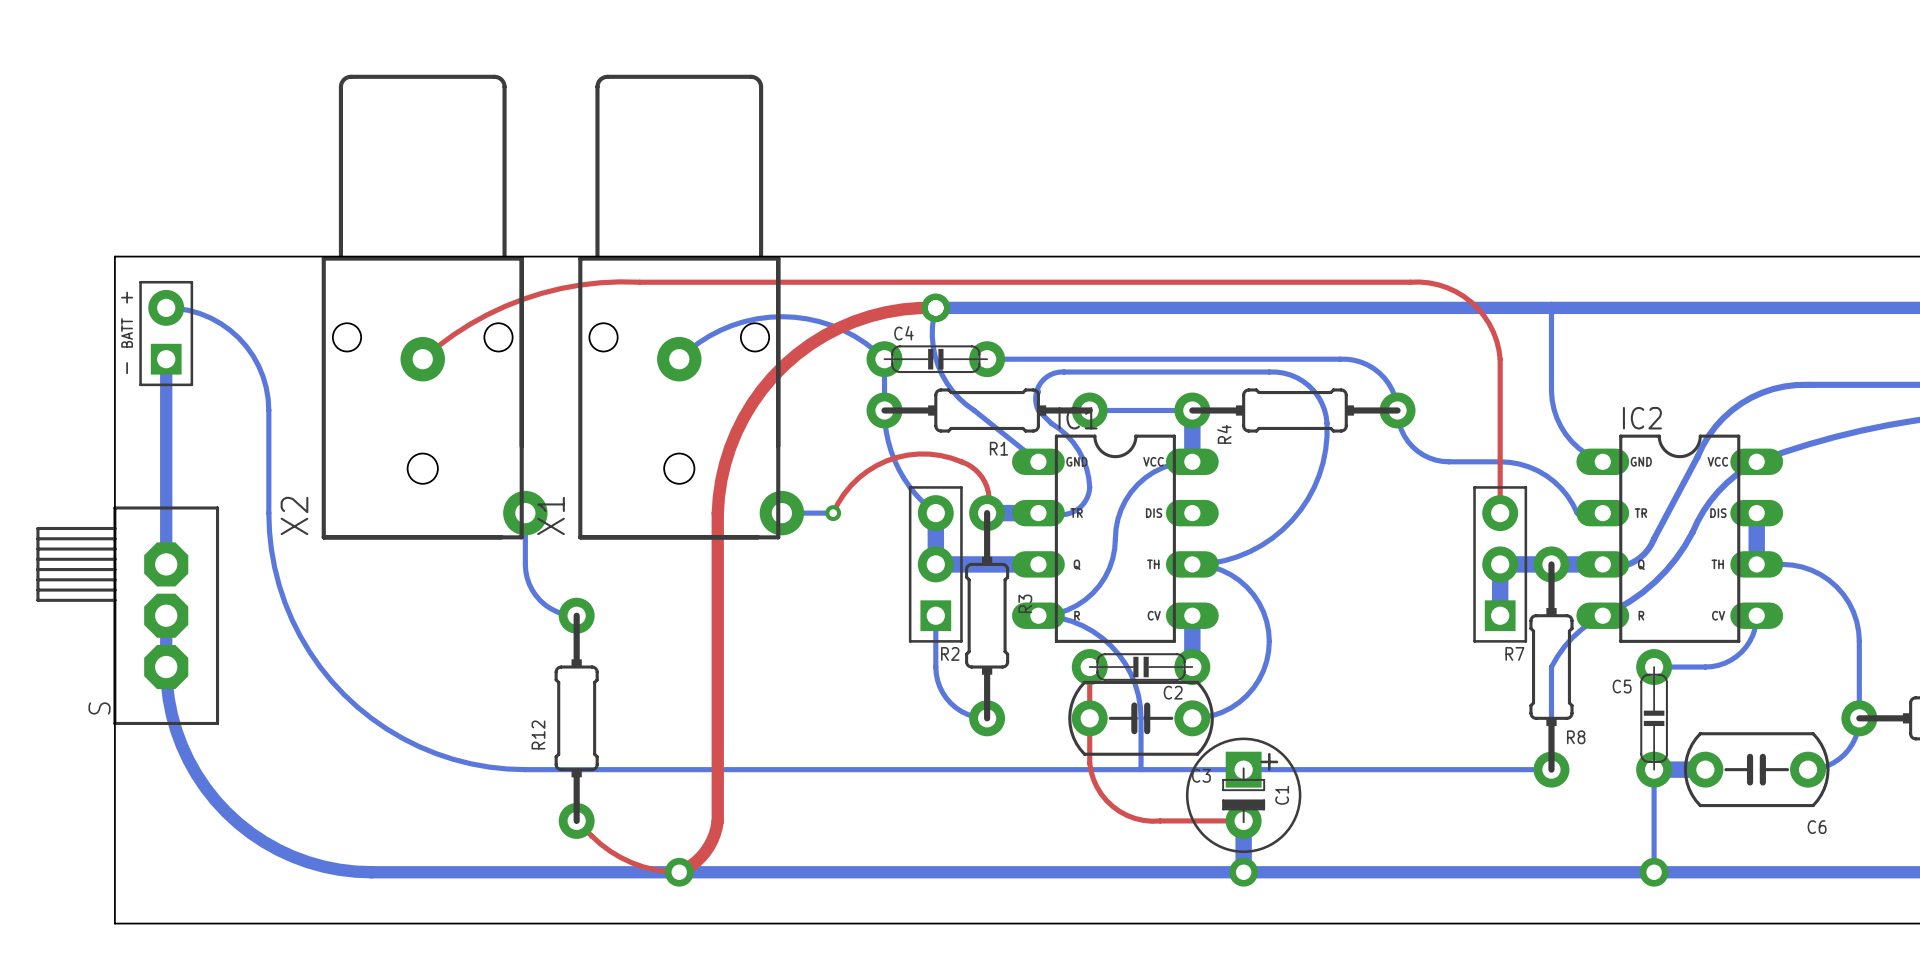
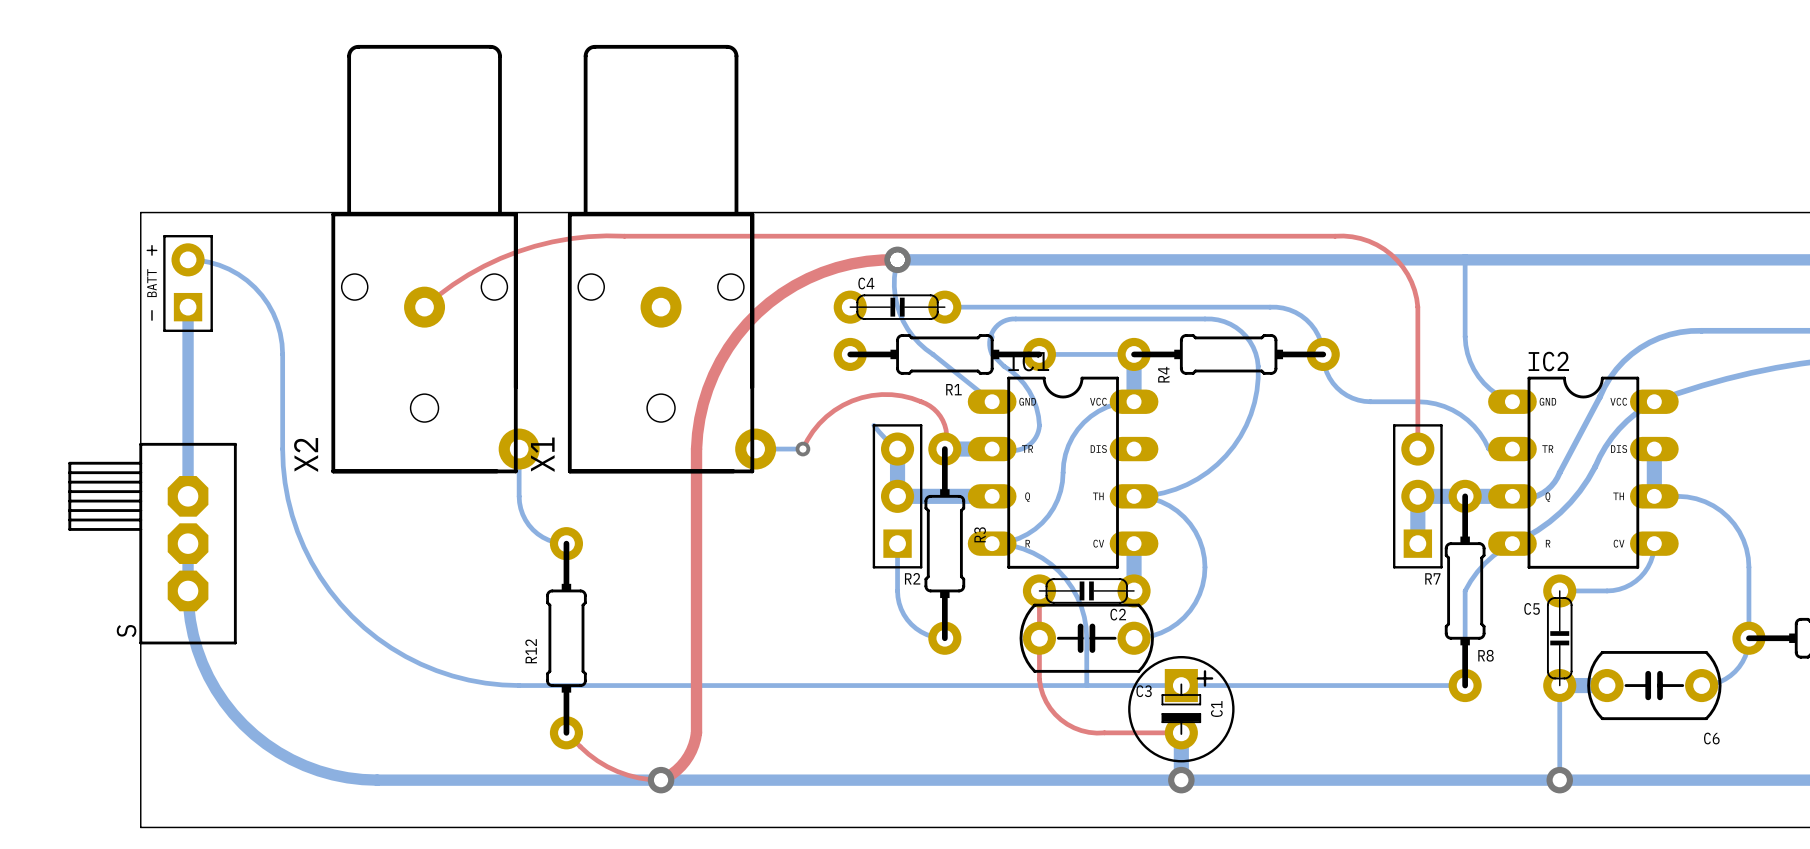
bottom track: (679, 359) (698, 342) (720, 330) (756, 318) (781, 316) (807, 318) (831, 325) (854, 336) (884, 359) (886, 431) (894, 460) (910, 487) -> none

